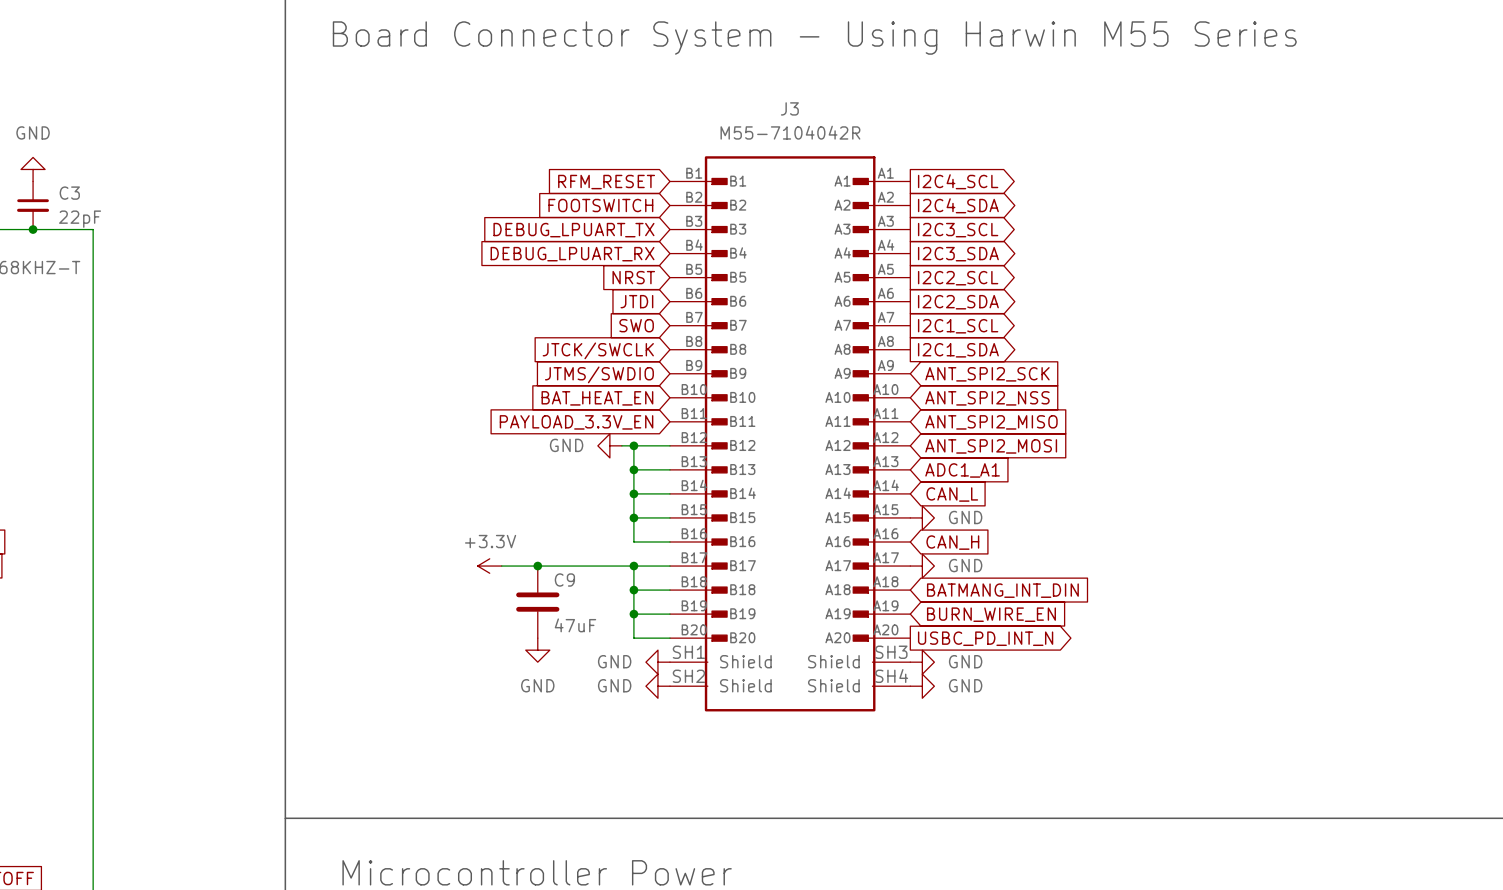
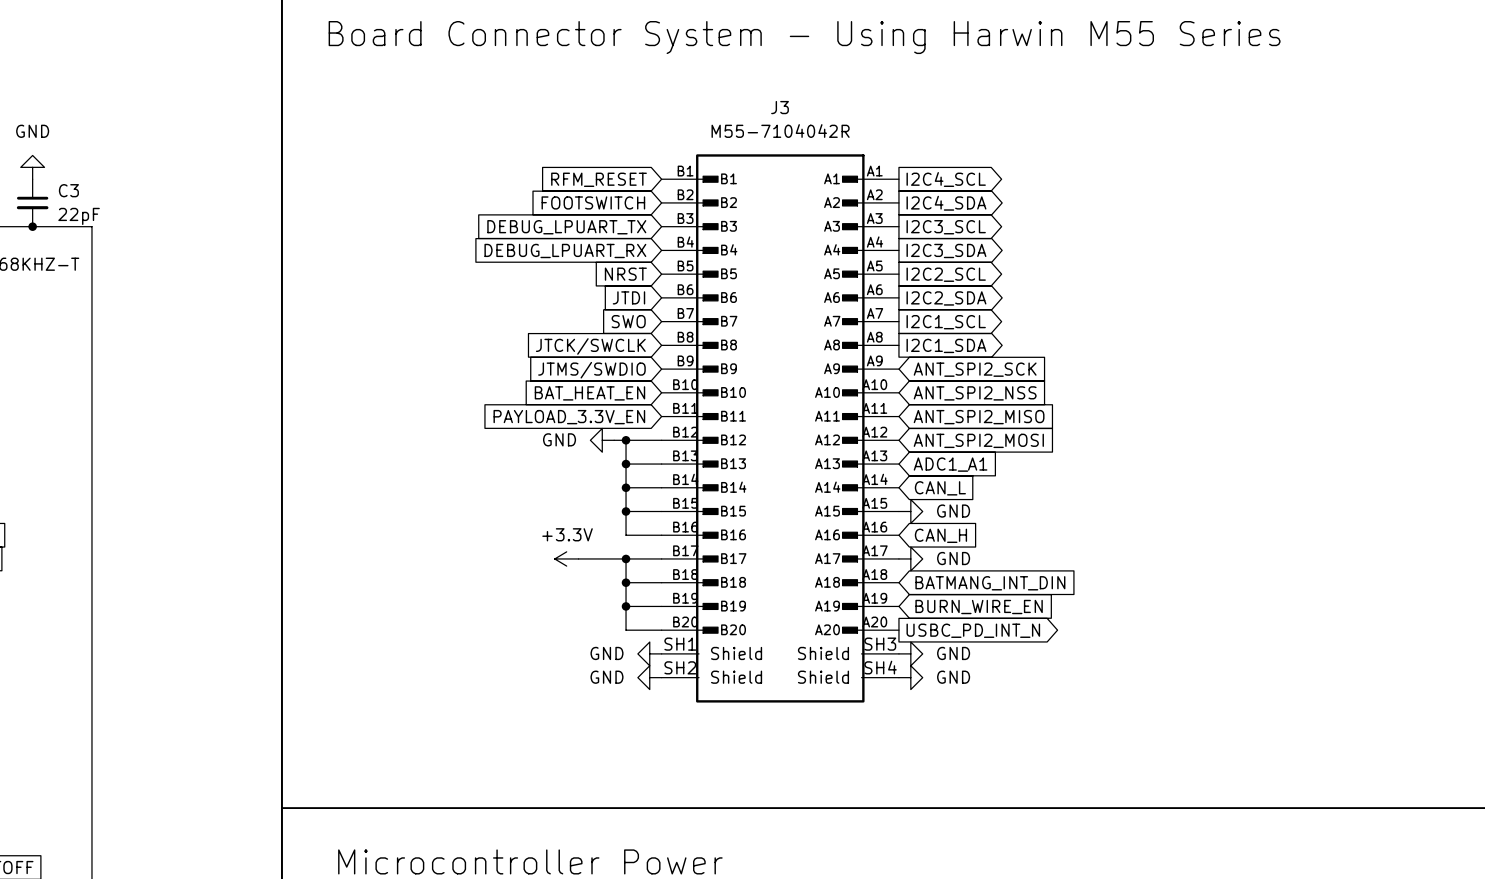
power symbol position: +3.3V (489, 566) -> +3.3V (566, 558)
wire: (501, 566) (585, 566) -> none
junction: (537, 566) -> none
C9: 47uF (537, 602) -> none
power symbol: GND (537, 650) -> none

